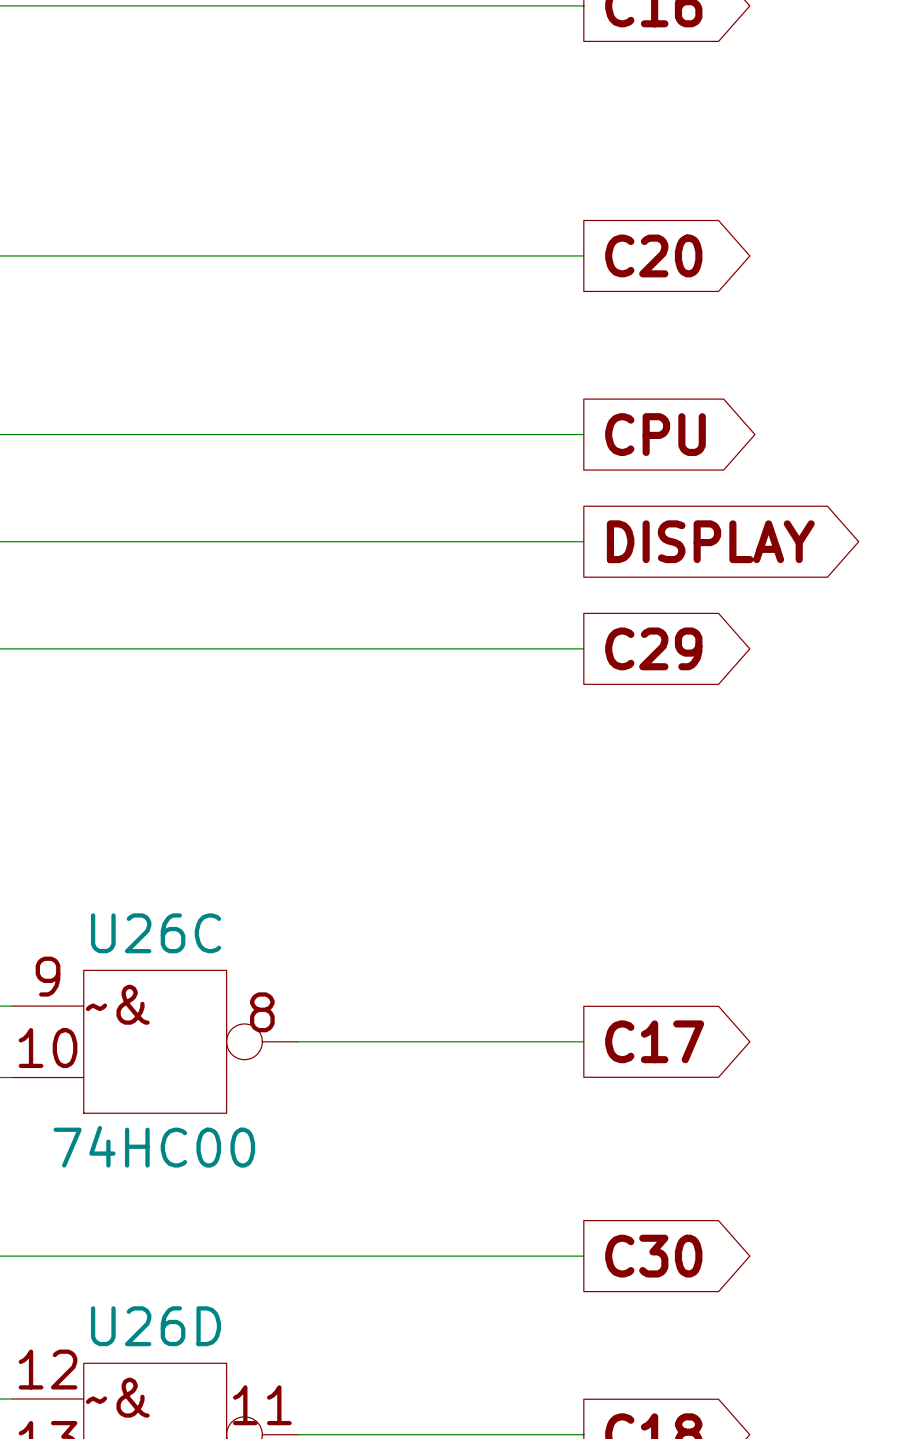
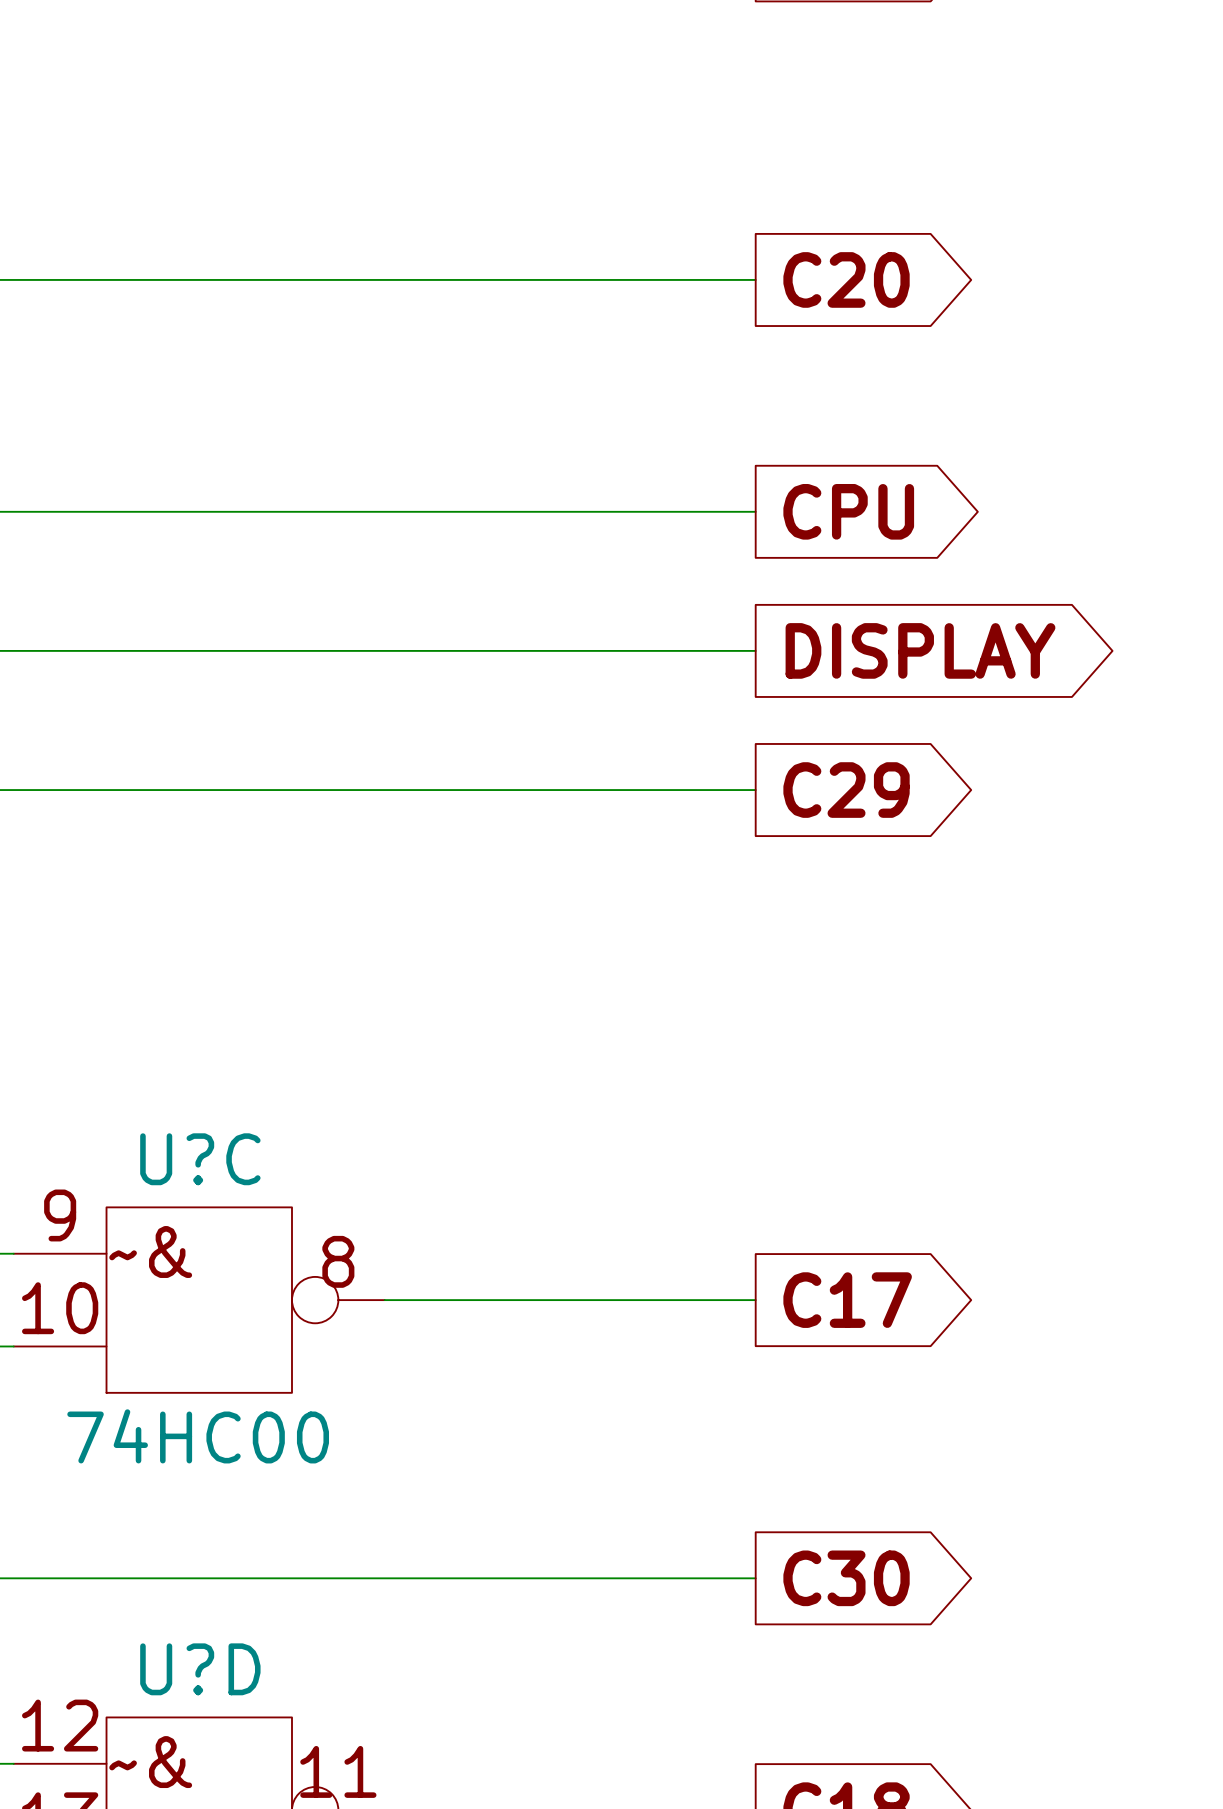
U26C name: U26C (156, 933) -> U?C (200, 1159)
U26D name: U26D (156, 1326) -> U?D (200, 1669)

